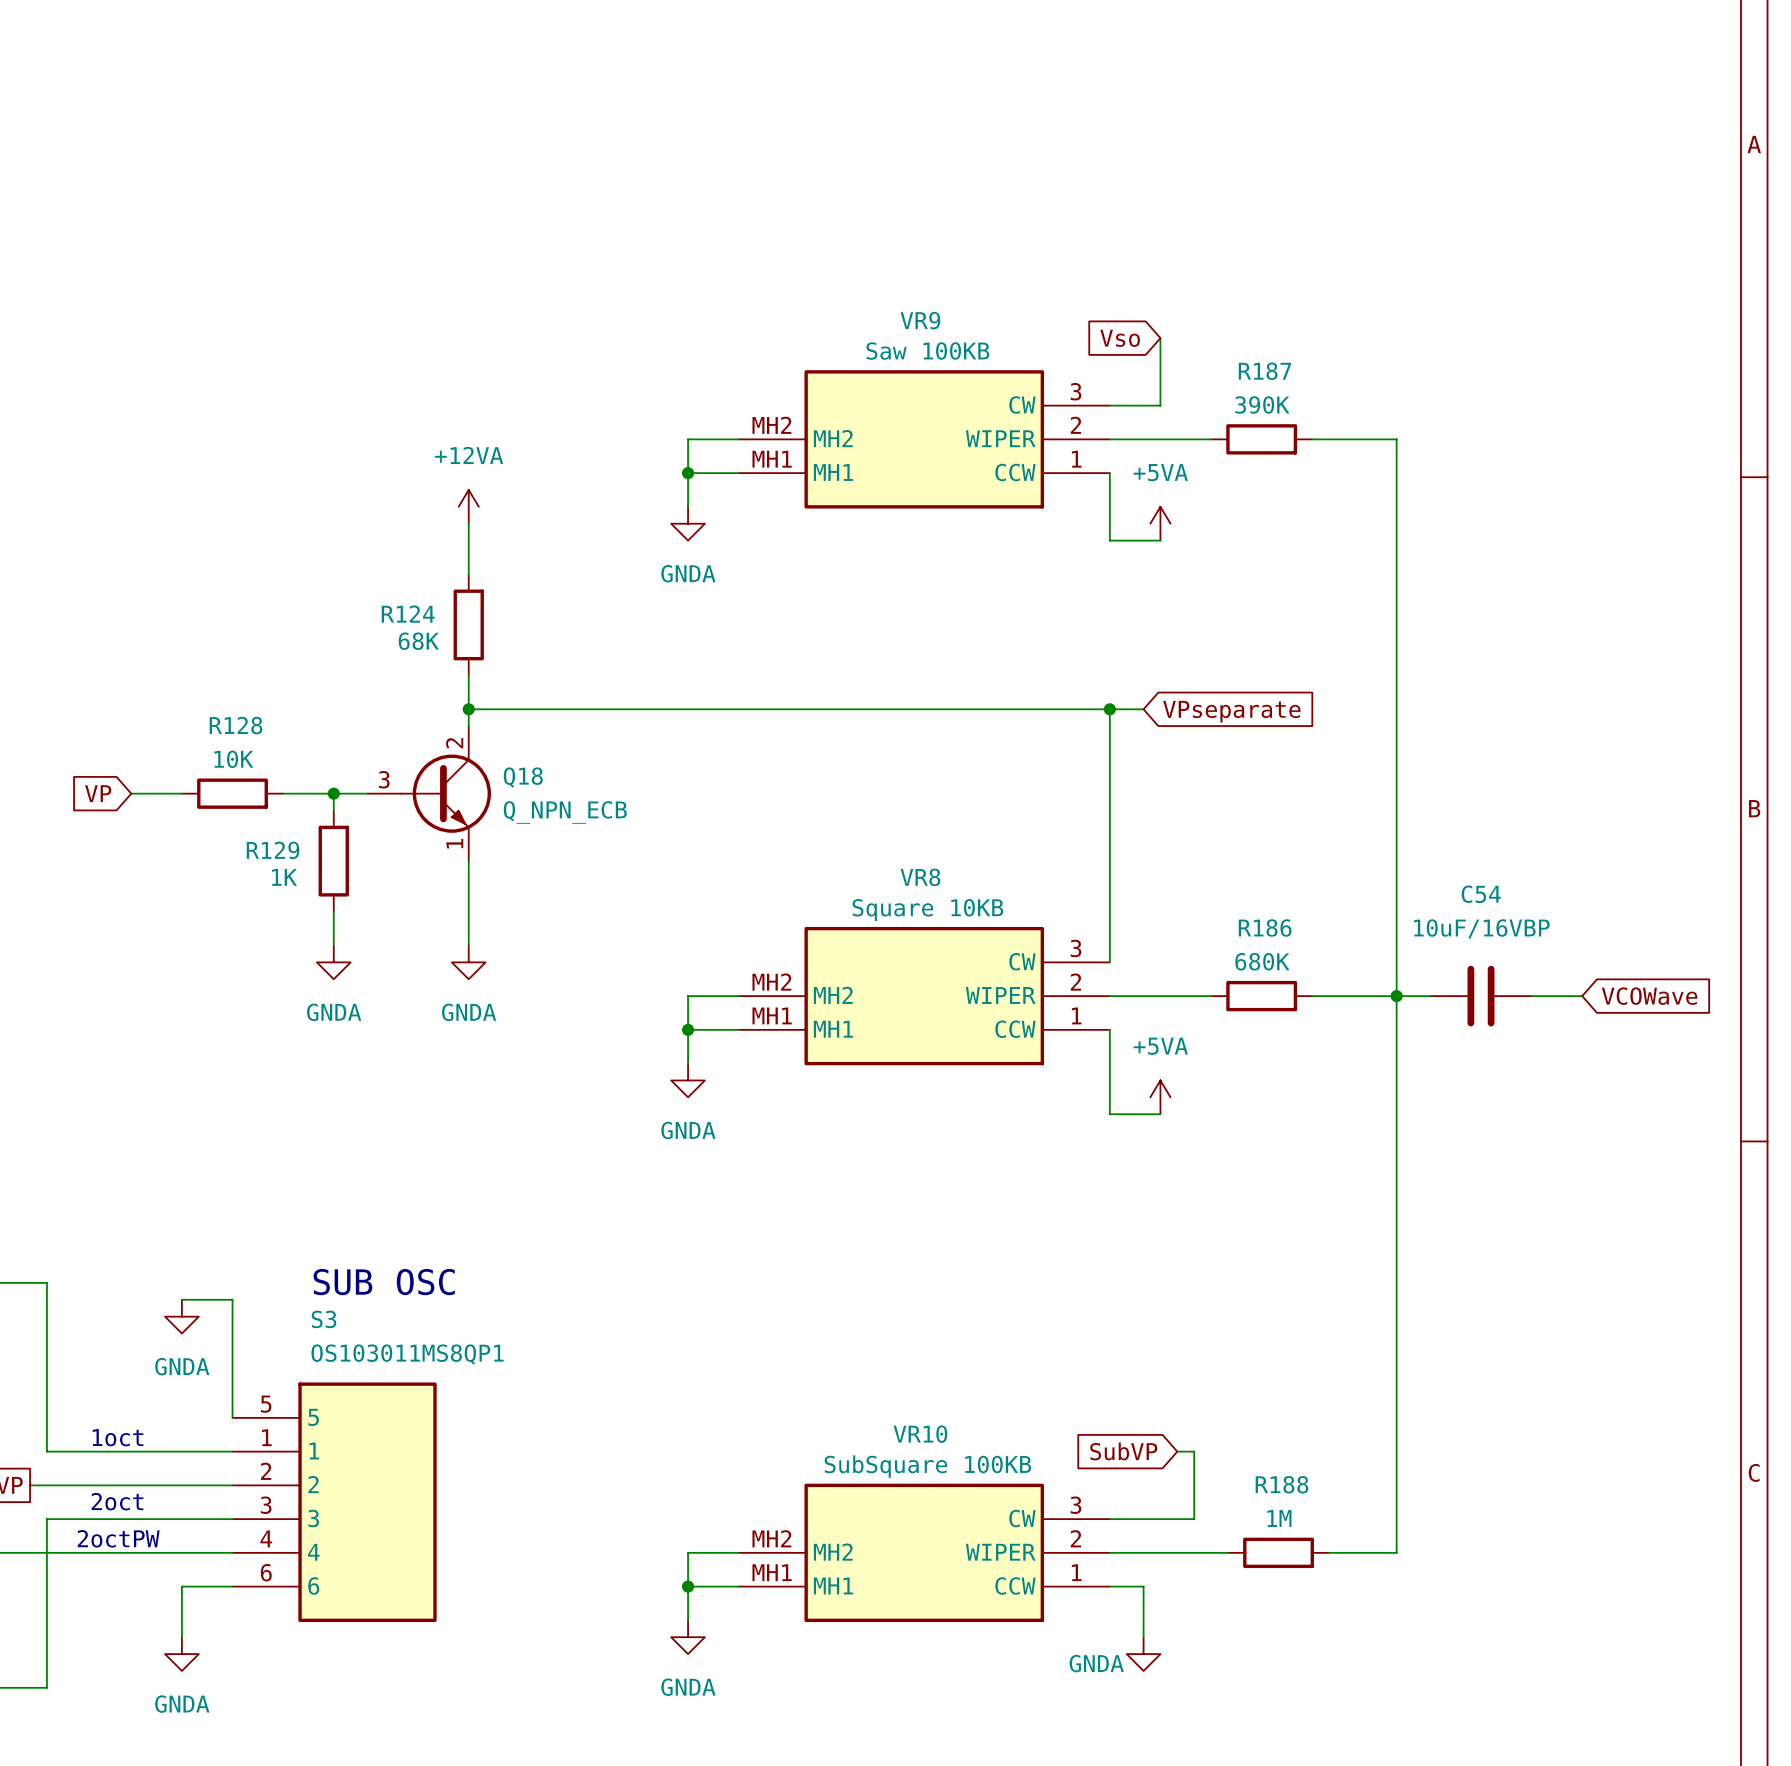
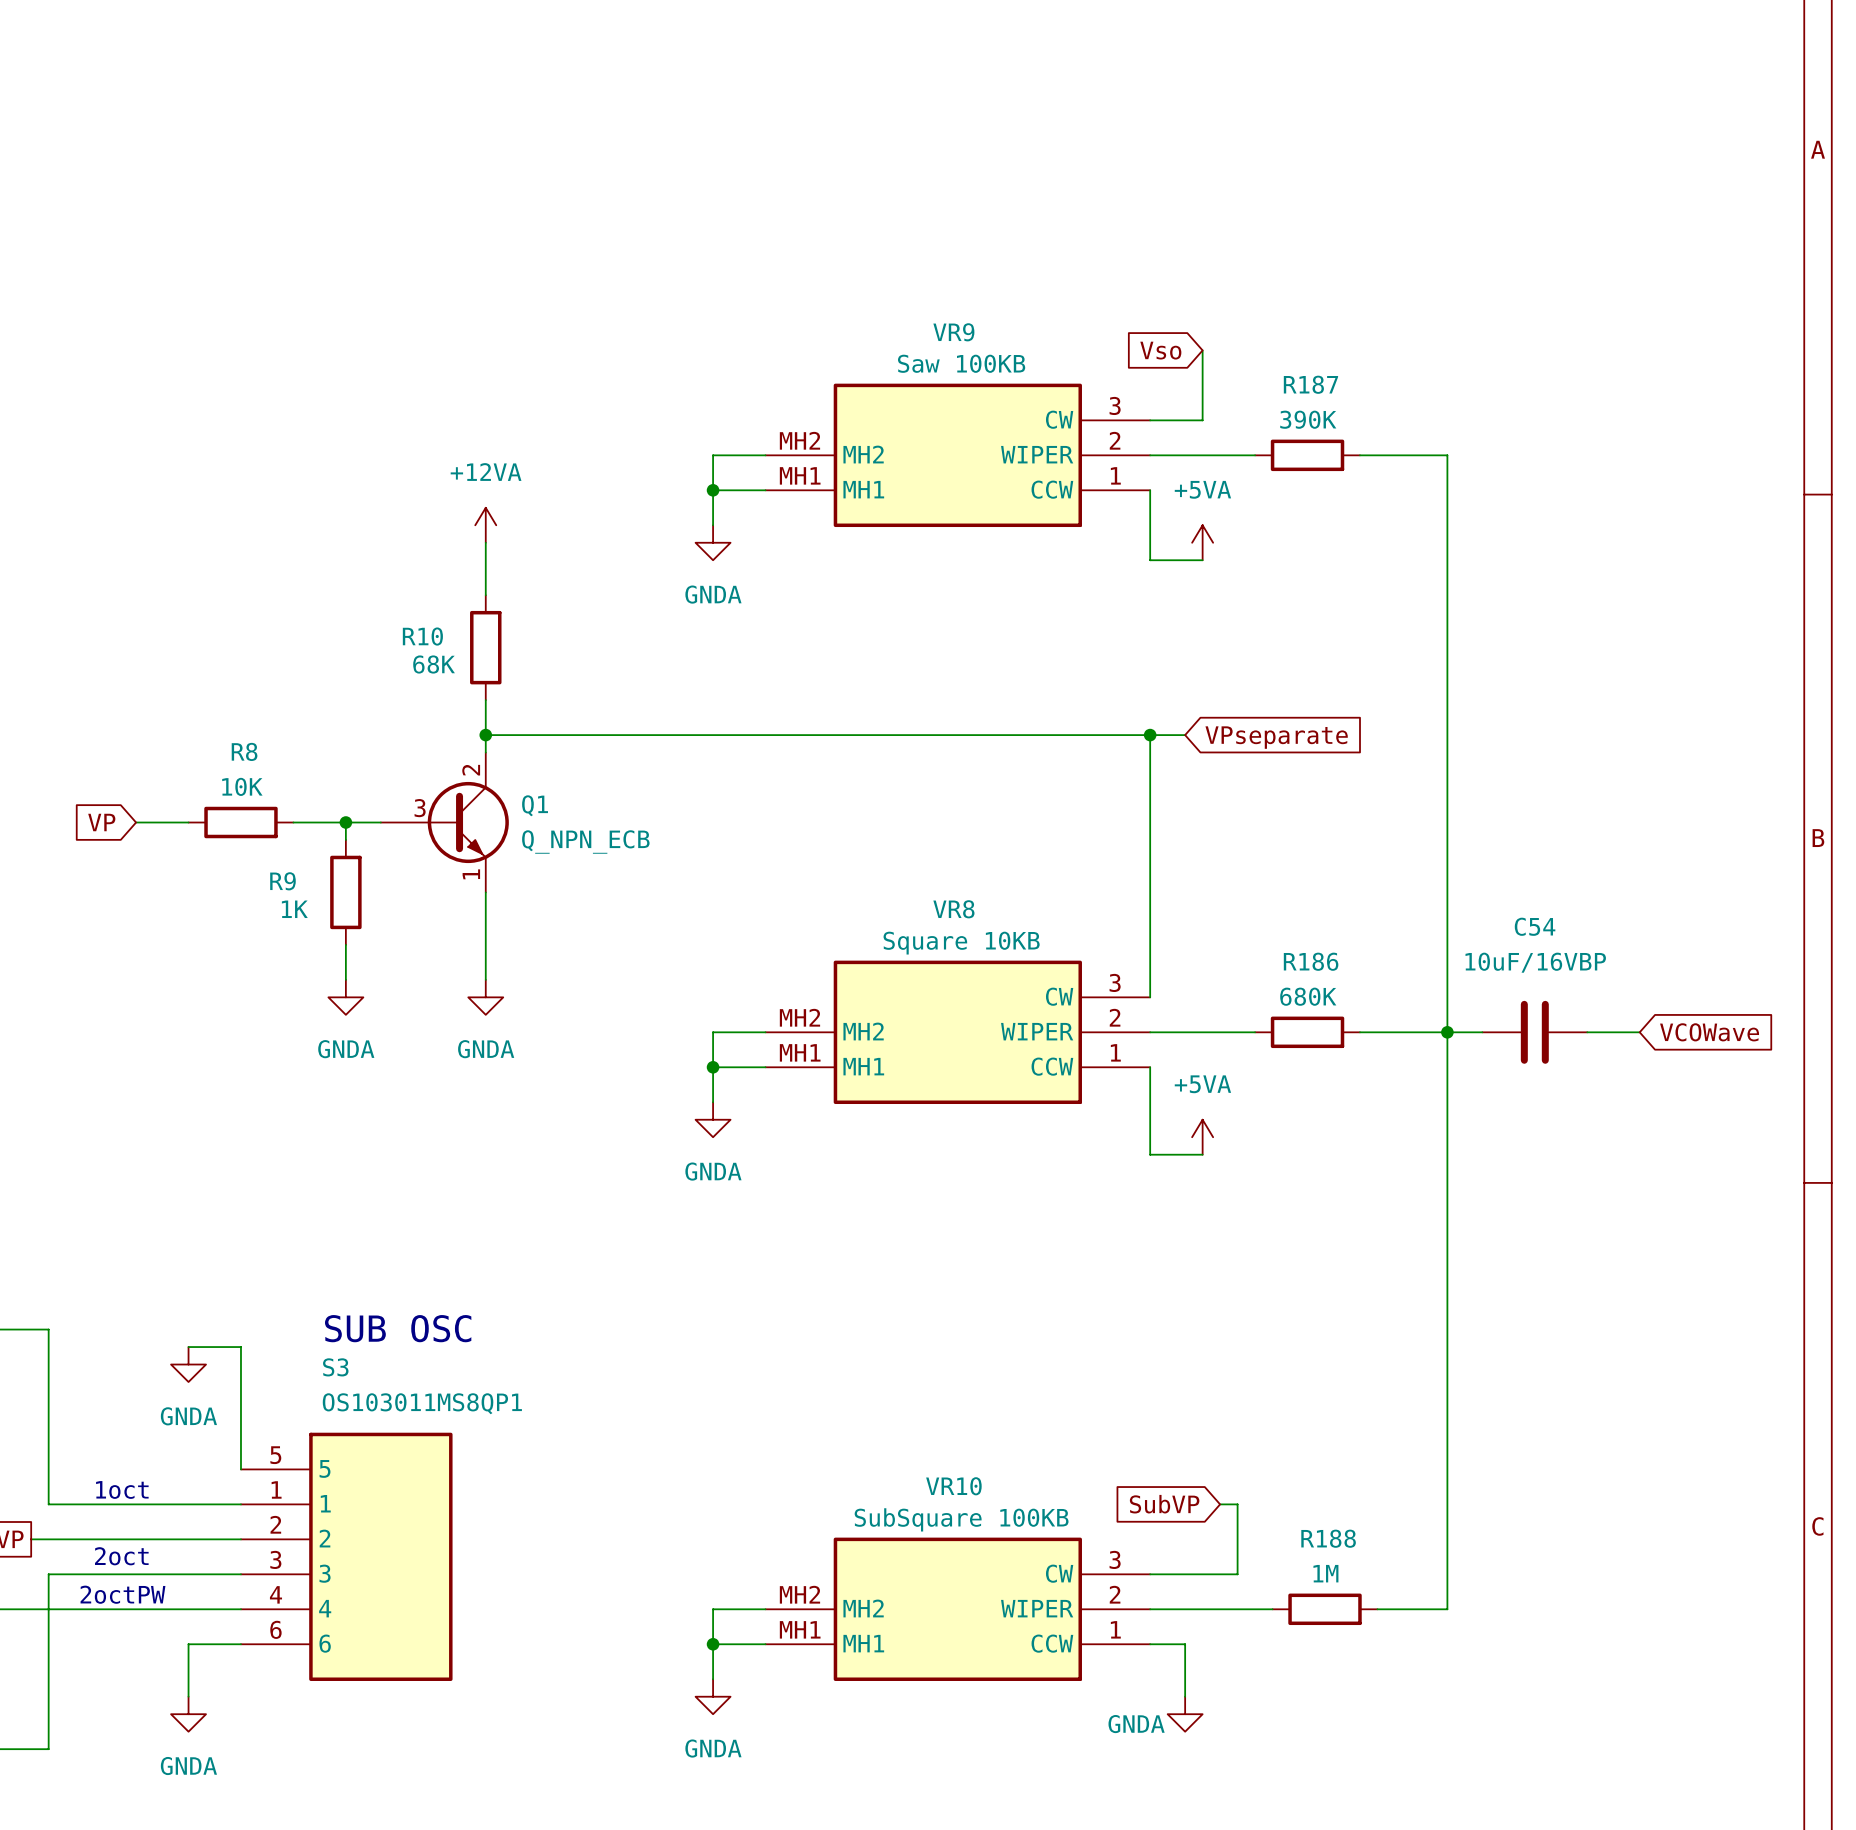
R124 name: R124 (408, 614) -> R10 (422, 636)
R128 name: R128 (235, 725) -> R8 (244, 751)
Q18: Q_NPN_ECB (429, 793) -> none
Q1: none -> Q_NPN_ECB (444, 822)
R129 name: R129 (273, 850) -> R9 (282, 881)

